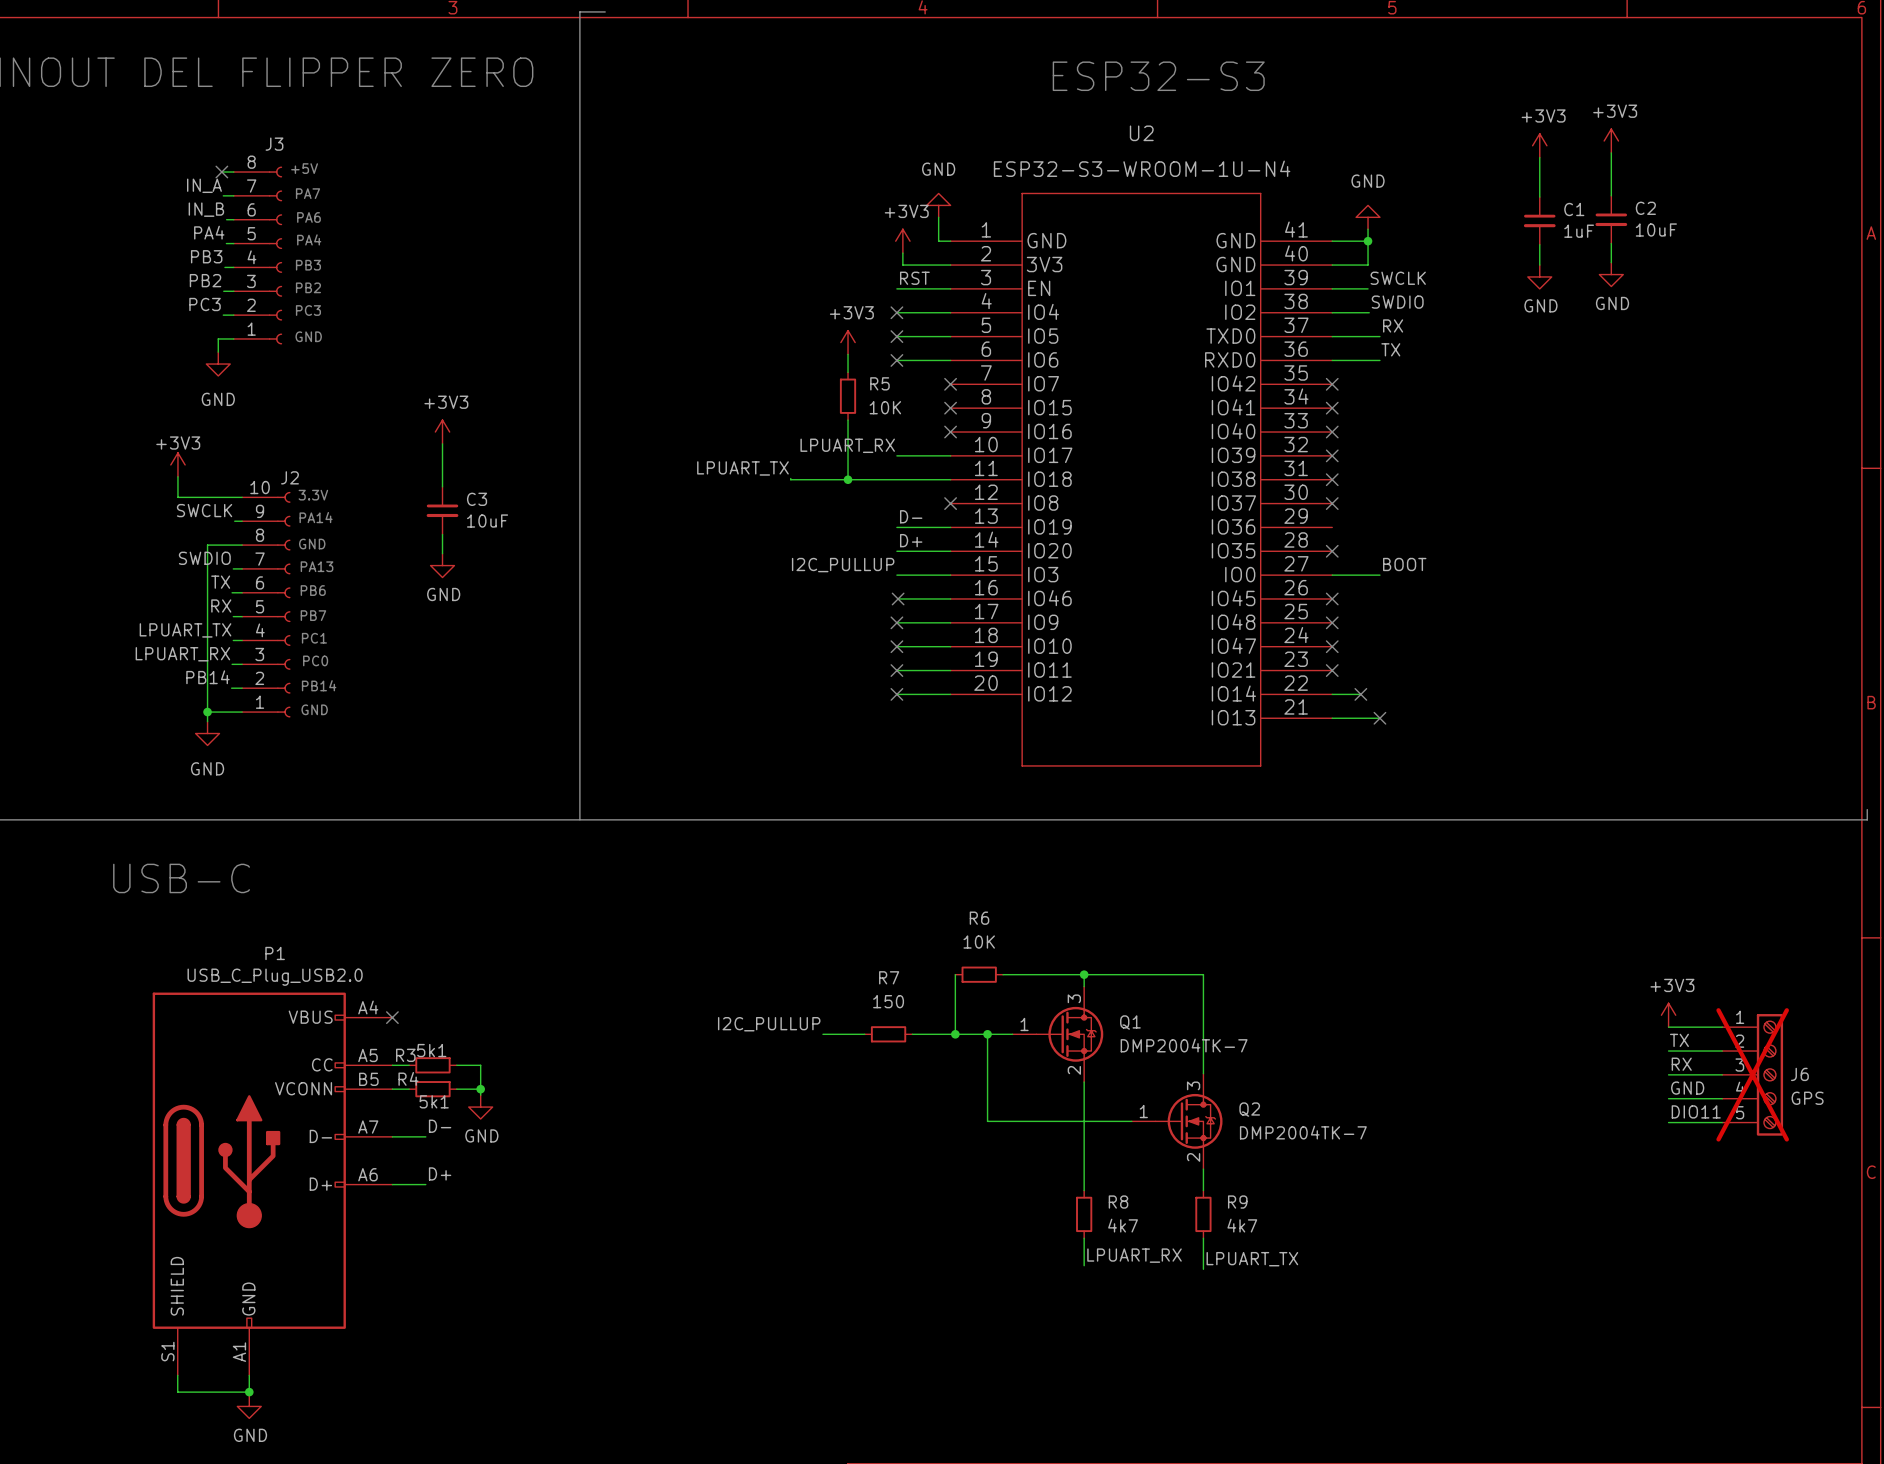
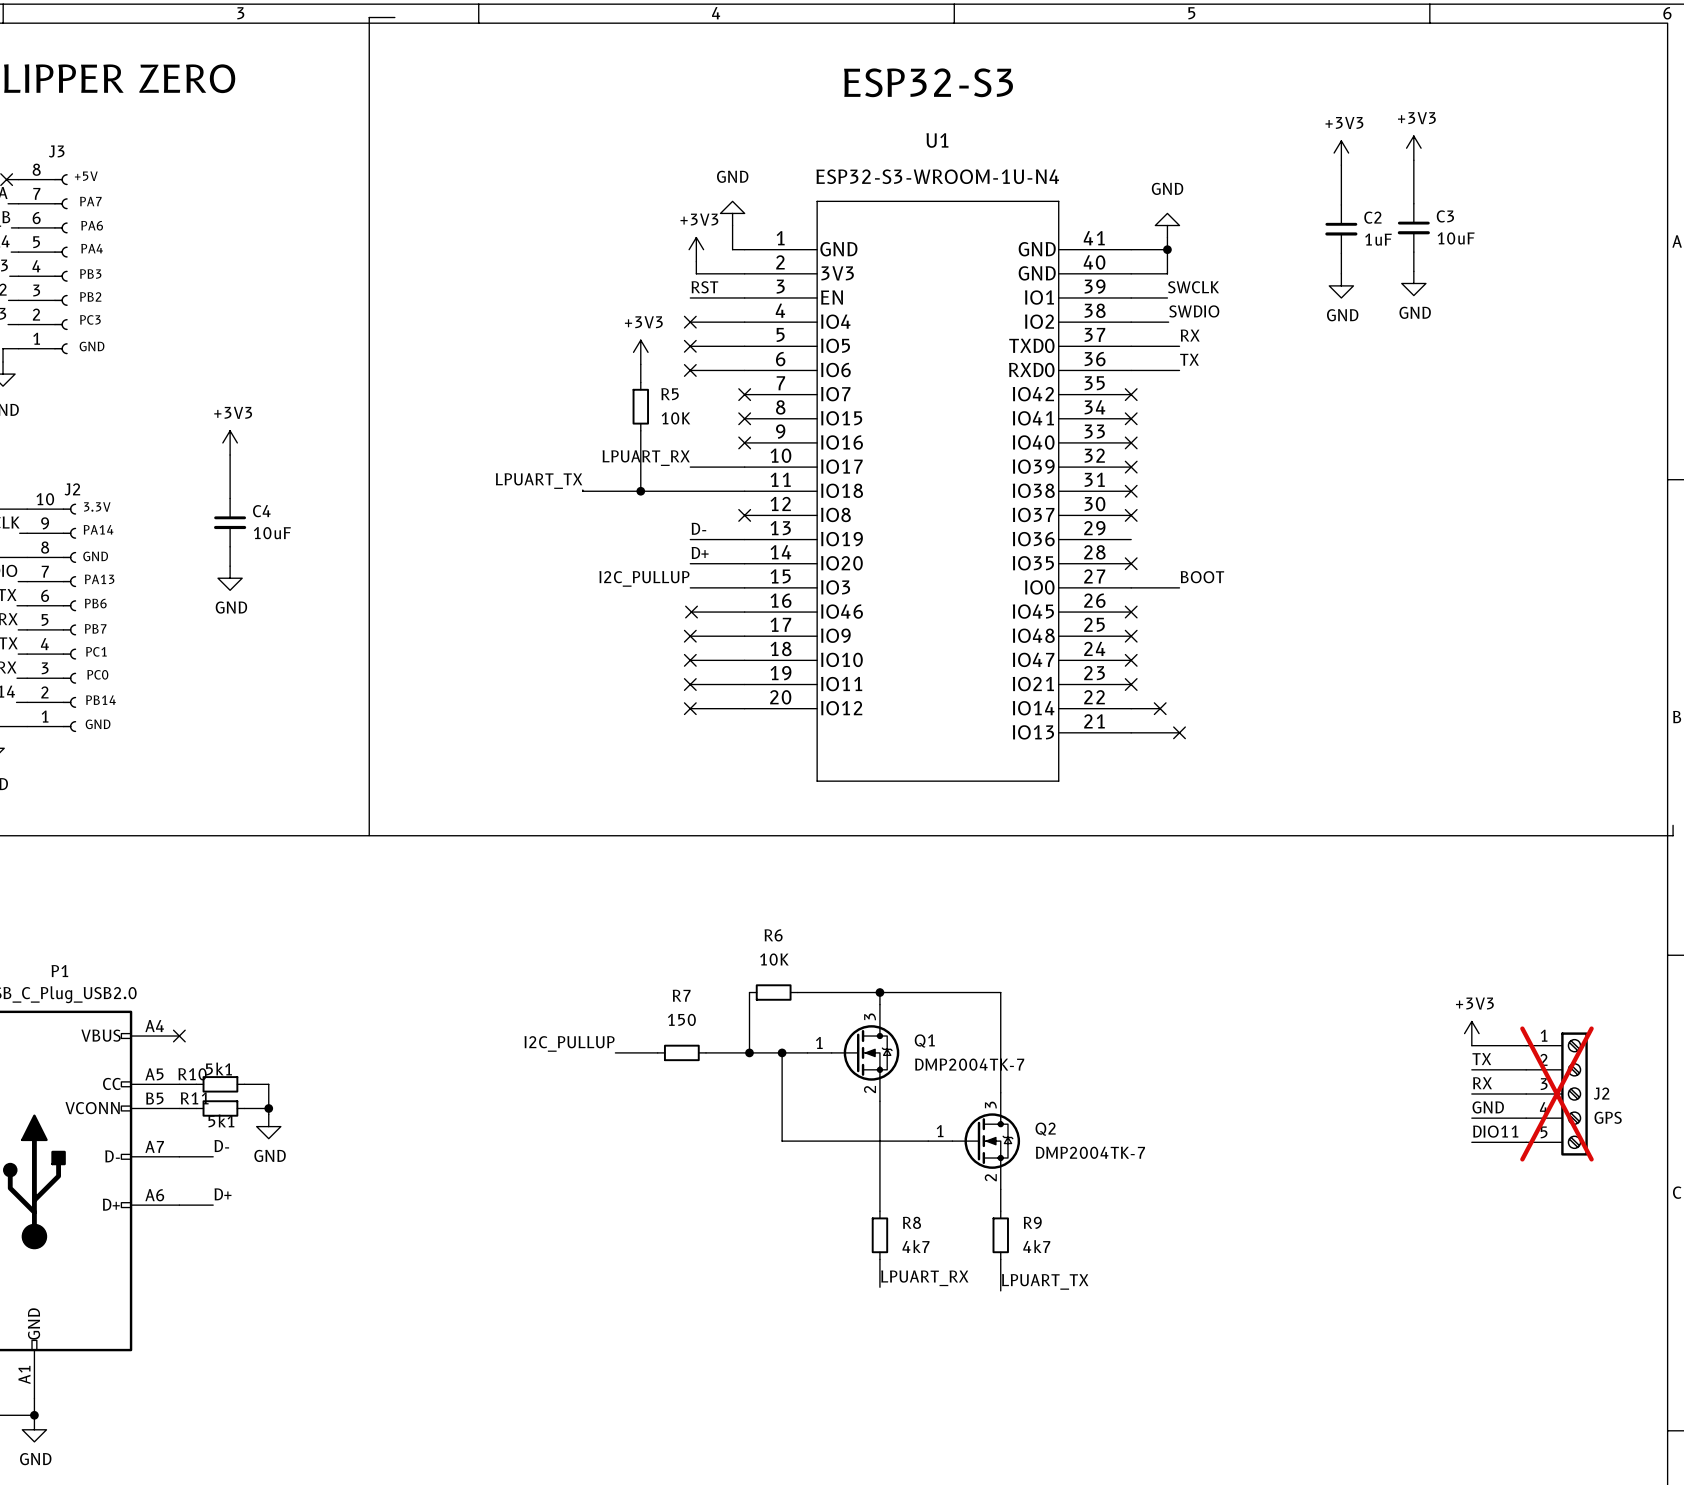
U2 name: U2 (1141, 133) -> U1 (937, 140)
C2 name: C2 (1645, 208) -> C3 (1445, 216)
C1 name: C1 (1574, 209) -> C2 (1372, 217)
C3 name: C3 (477, 499) -> C4 (261, 511)
R3 name: R3 (405, 1055) -> R10 (192, 1074)
J6 name: J6 (1799, 1074) -> J2 (1601, 1093)
R4 name: R4 (408, 1078) -> R11 (194, 1098)

